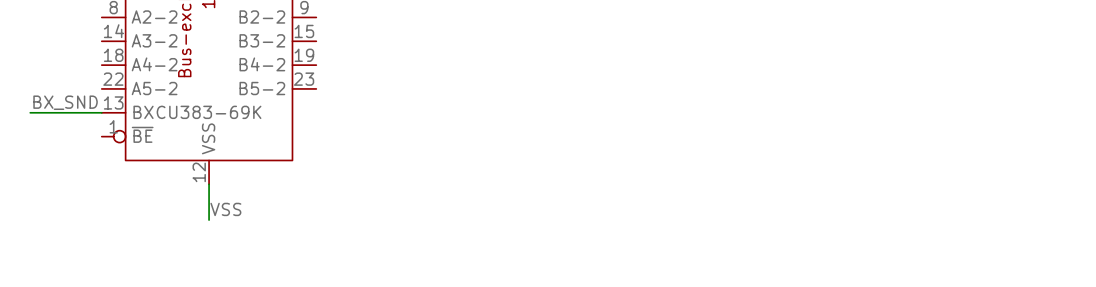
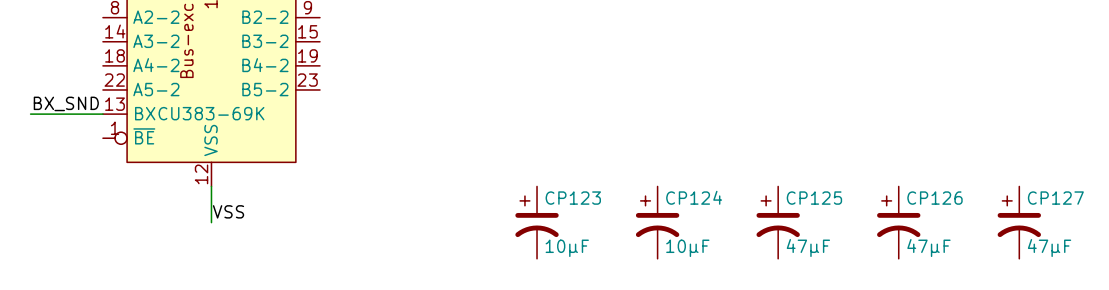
CP123: none -> 10μF (537, 222)
CP124: none -> 10μF (657, 222)
CP125: none -> 47μF (778, 222)
CP126: none -> 47μF (898, 222)
CP127: none -> 47μF (1019, 222)

